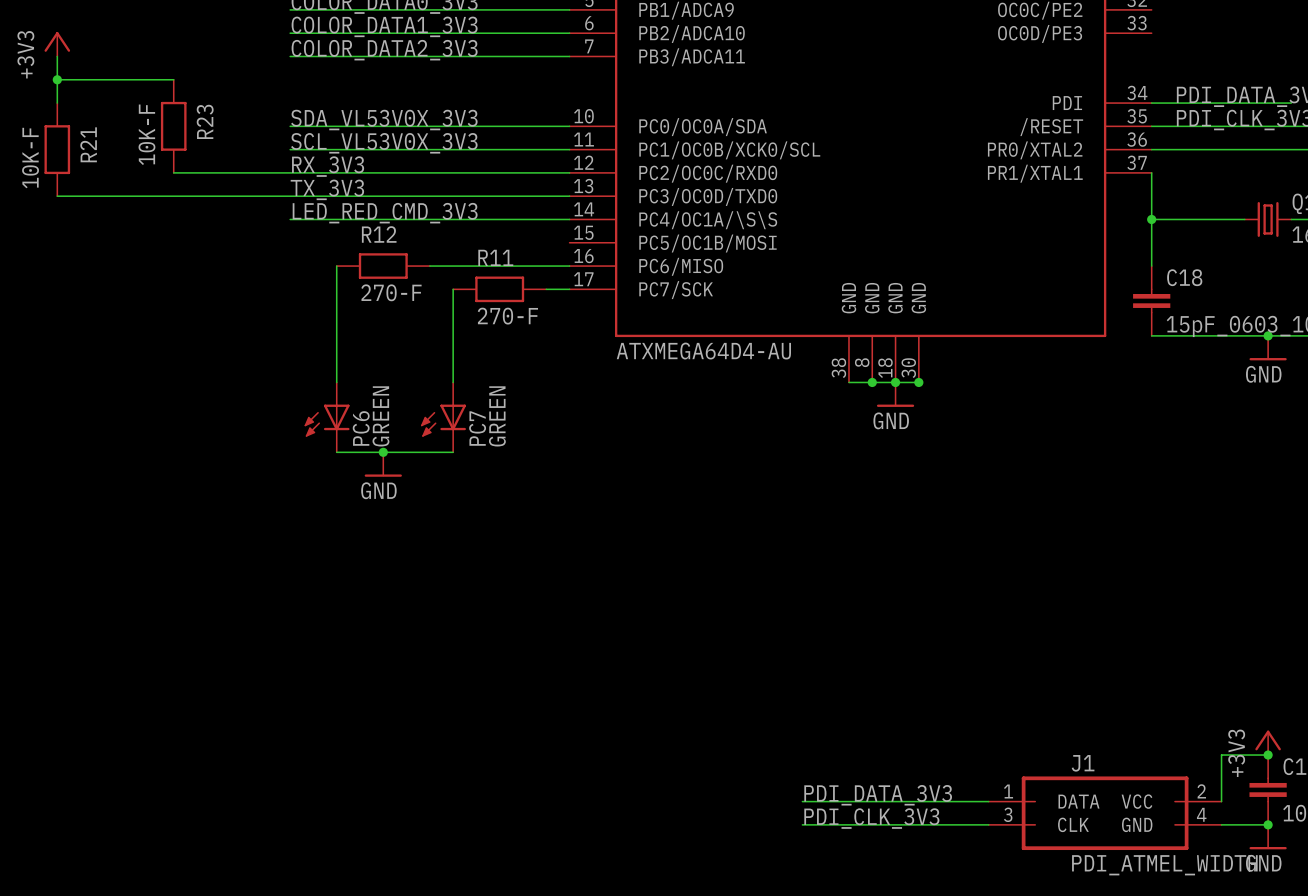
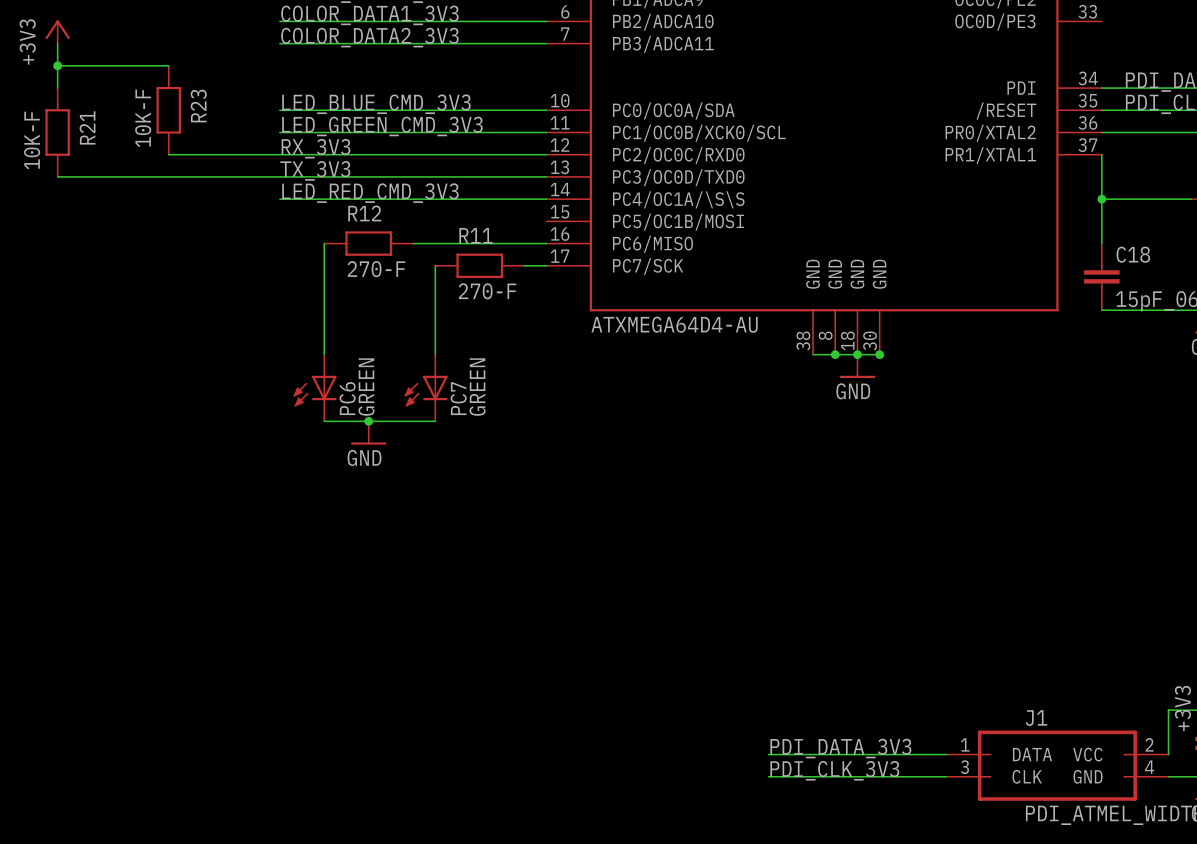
label: SDA_VL53V0X_3V3 (384, 120) -> LED_BLUE_CMD_3V3 (376, 104)
label: SCL_VL53V0X_3V3 (384, 143) -> LED_GREEN_CMD_3V3 (382, 126)

